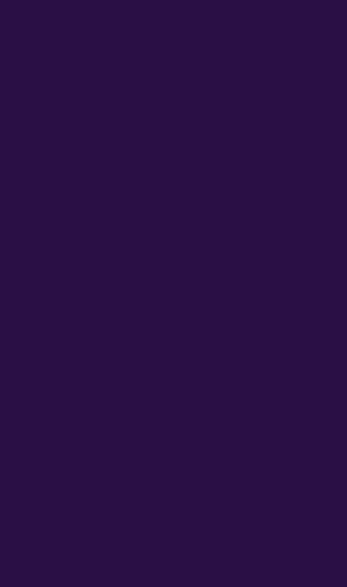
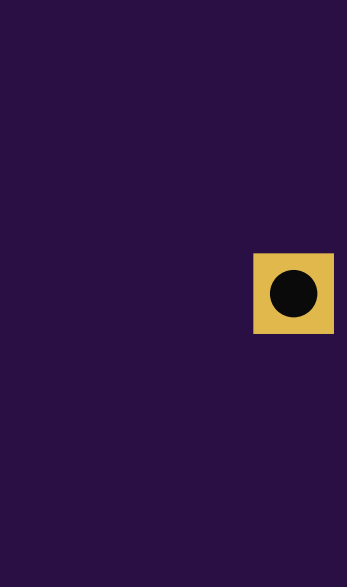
part: none -> (293, 293)

